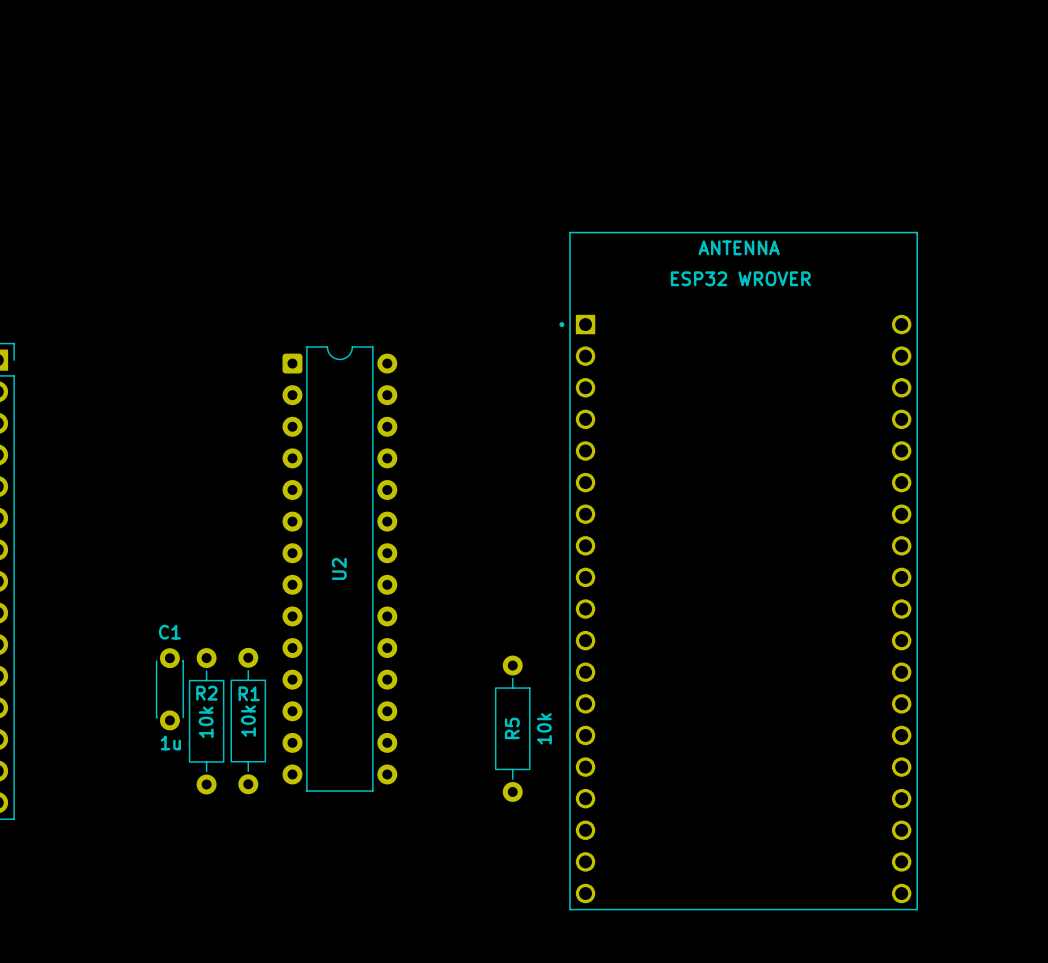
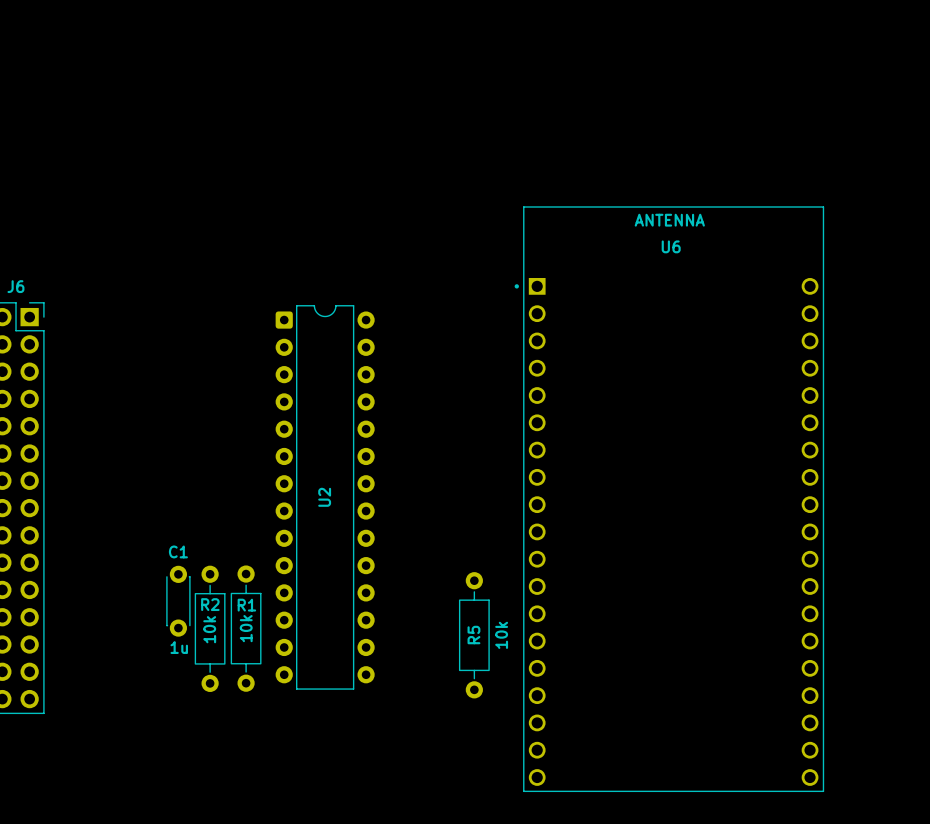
ESP32 WROVER name: ESP32 WROVER (740, 278) -> U6 (671, 246)

